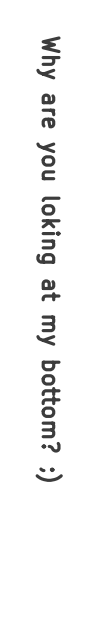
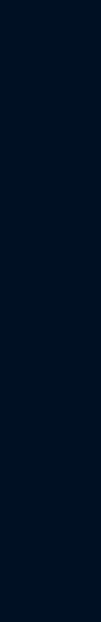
text: Why are you loking at my bottom? ;) (49, 259) -> none

